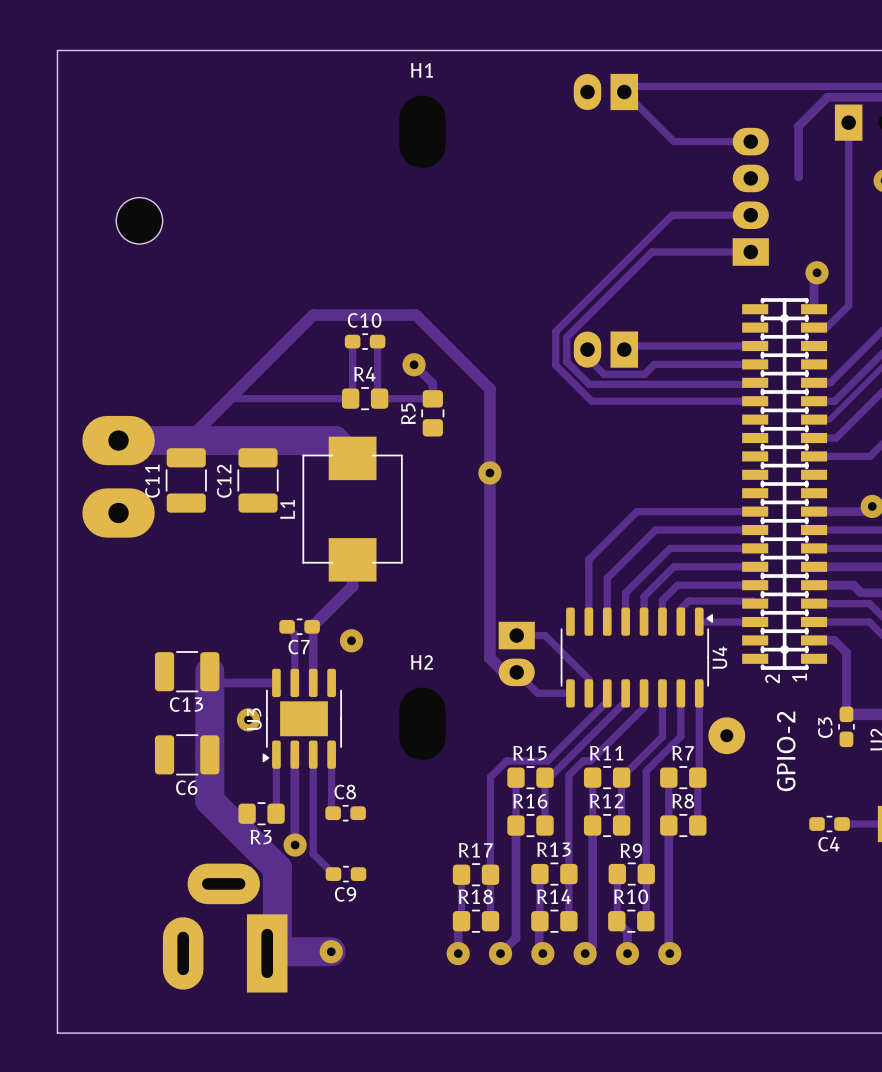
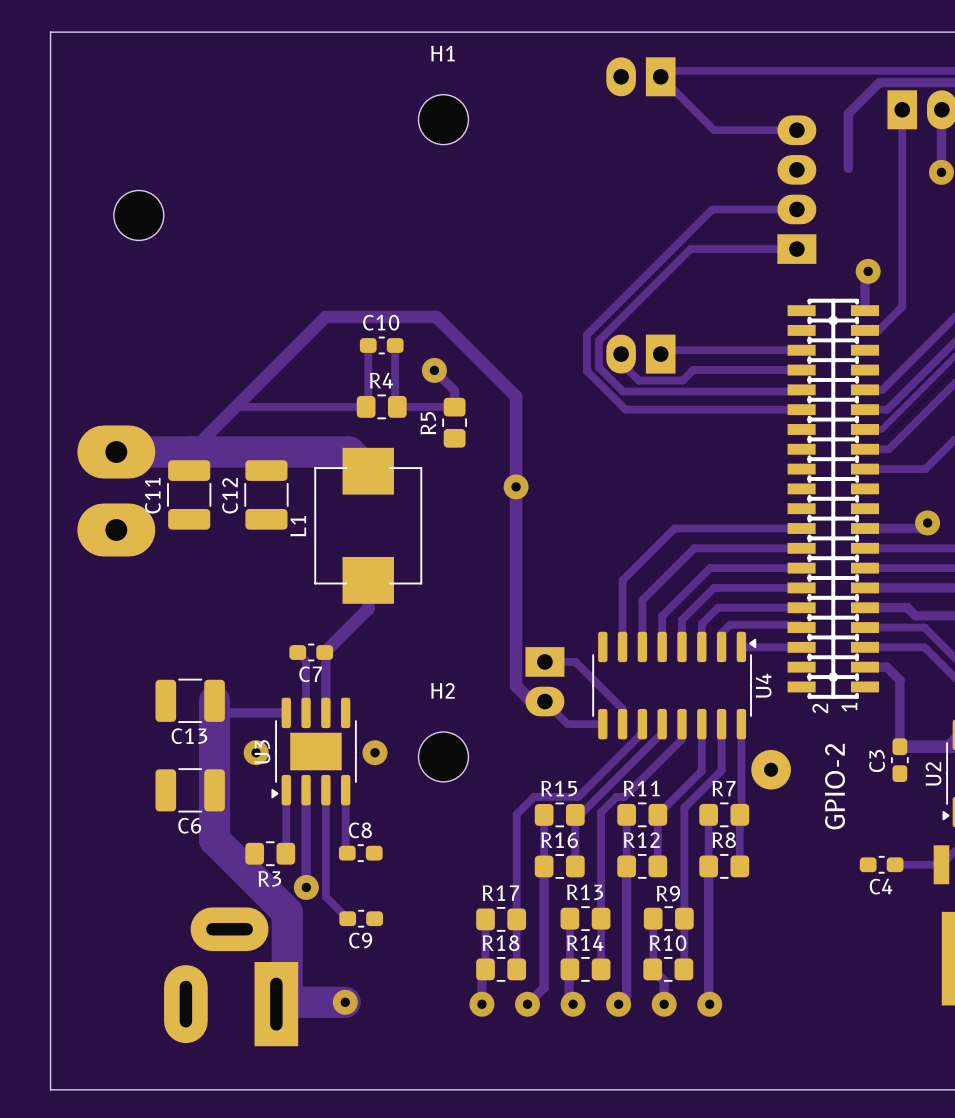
H1 footprint: [399, 95, 446, 169] -> [418, 94, 469, 145]
via position: (351, 640) -> (374, 752)
H2 footprint: [399, 687, 446, 761] -> [418, 731, 469, 782]

